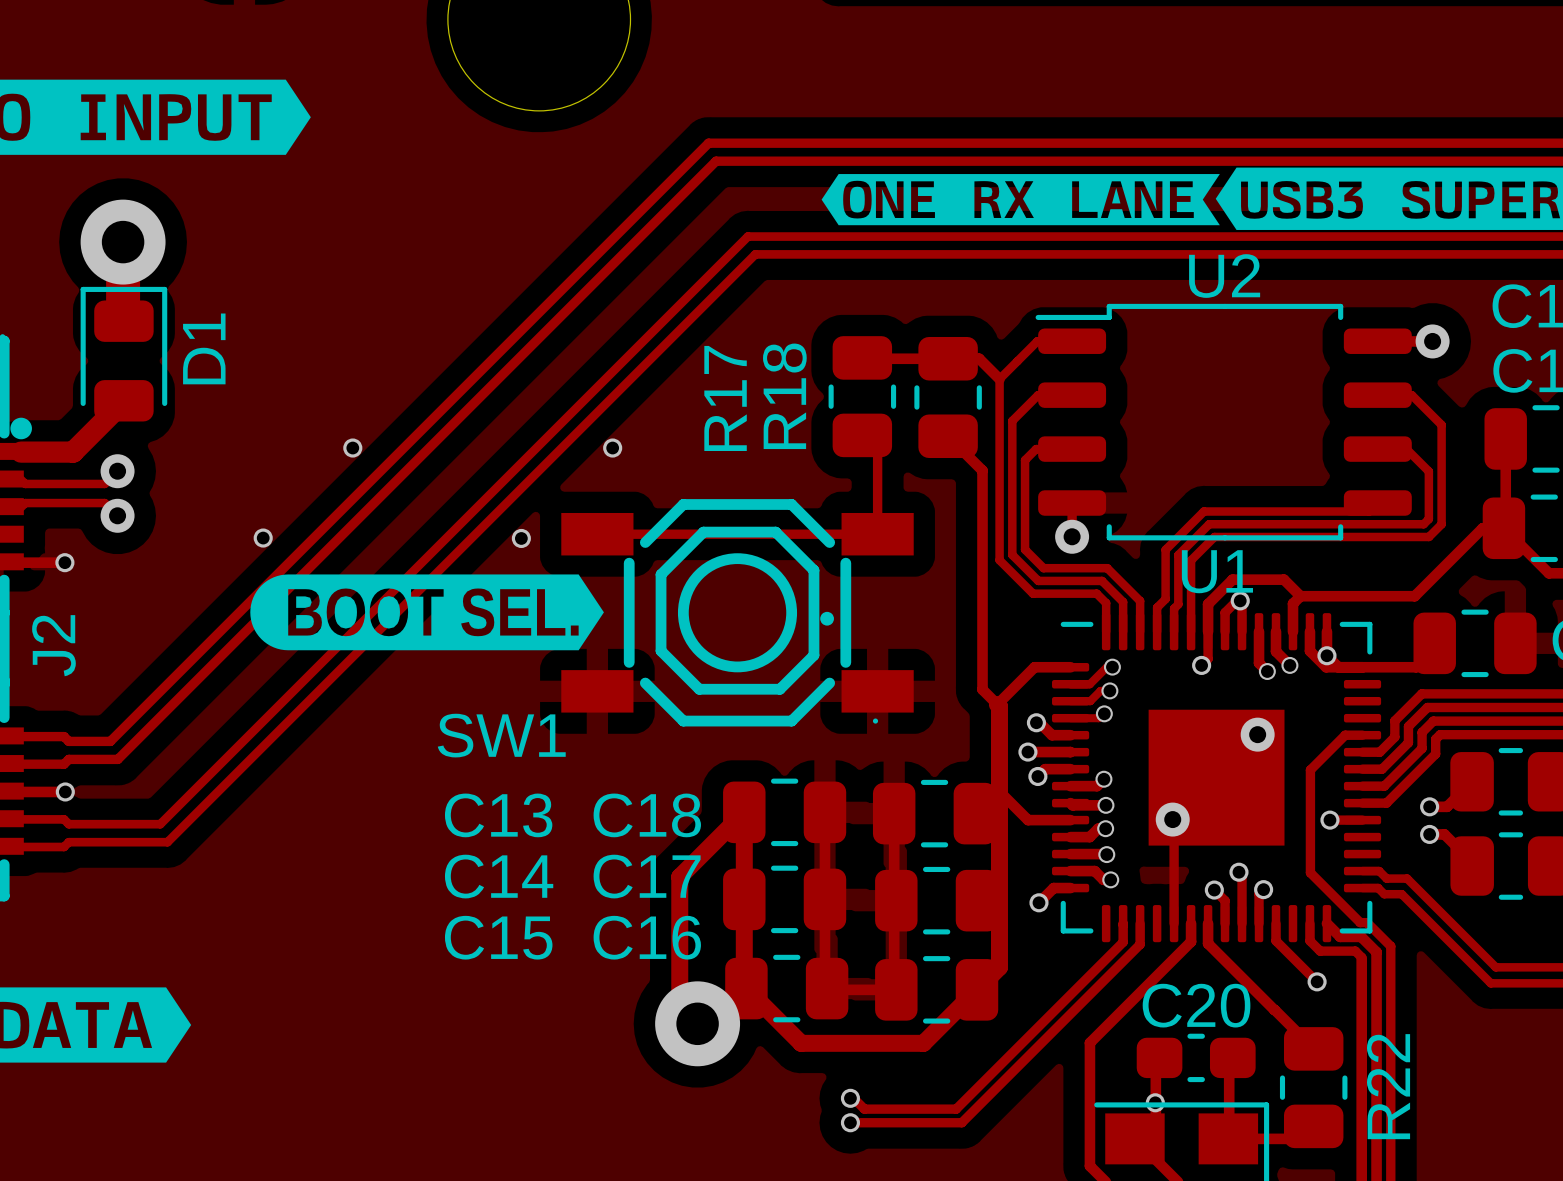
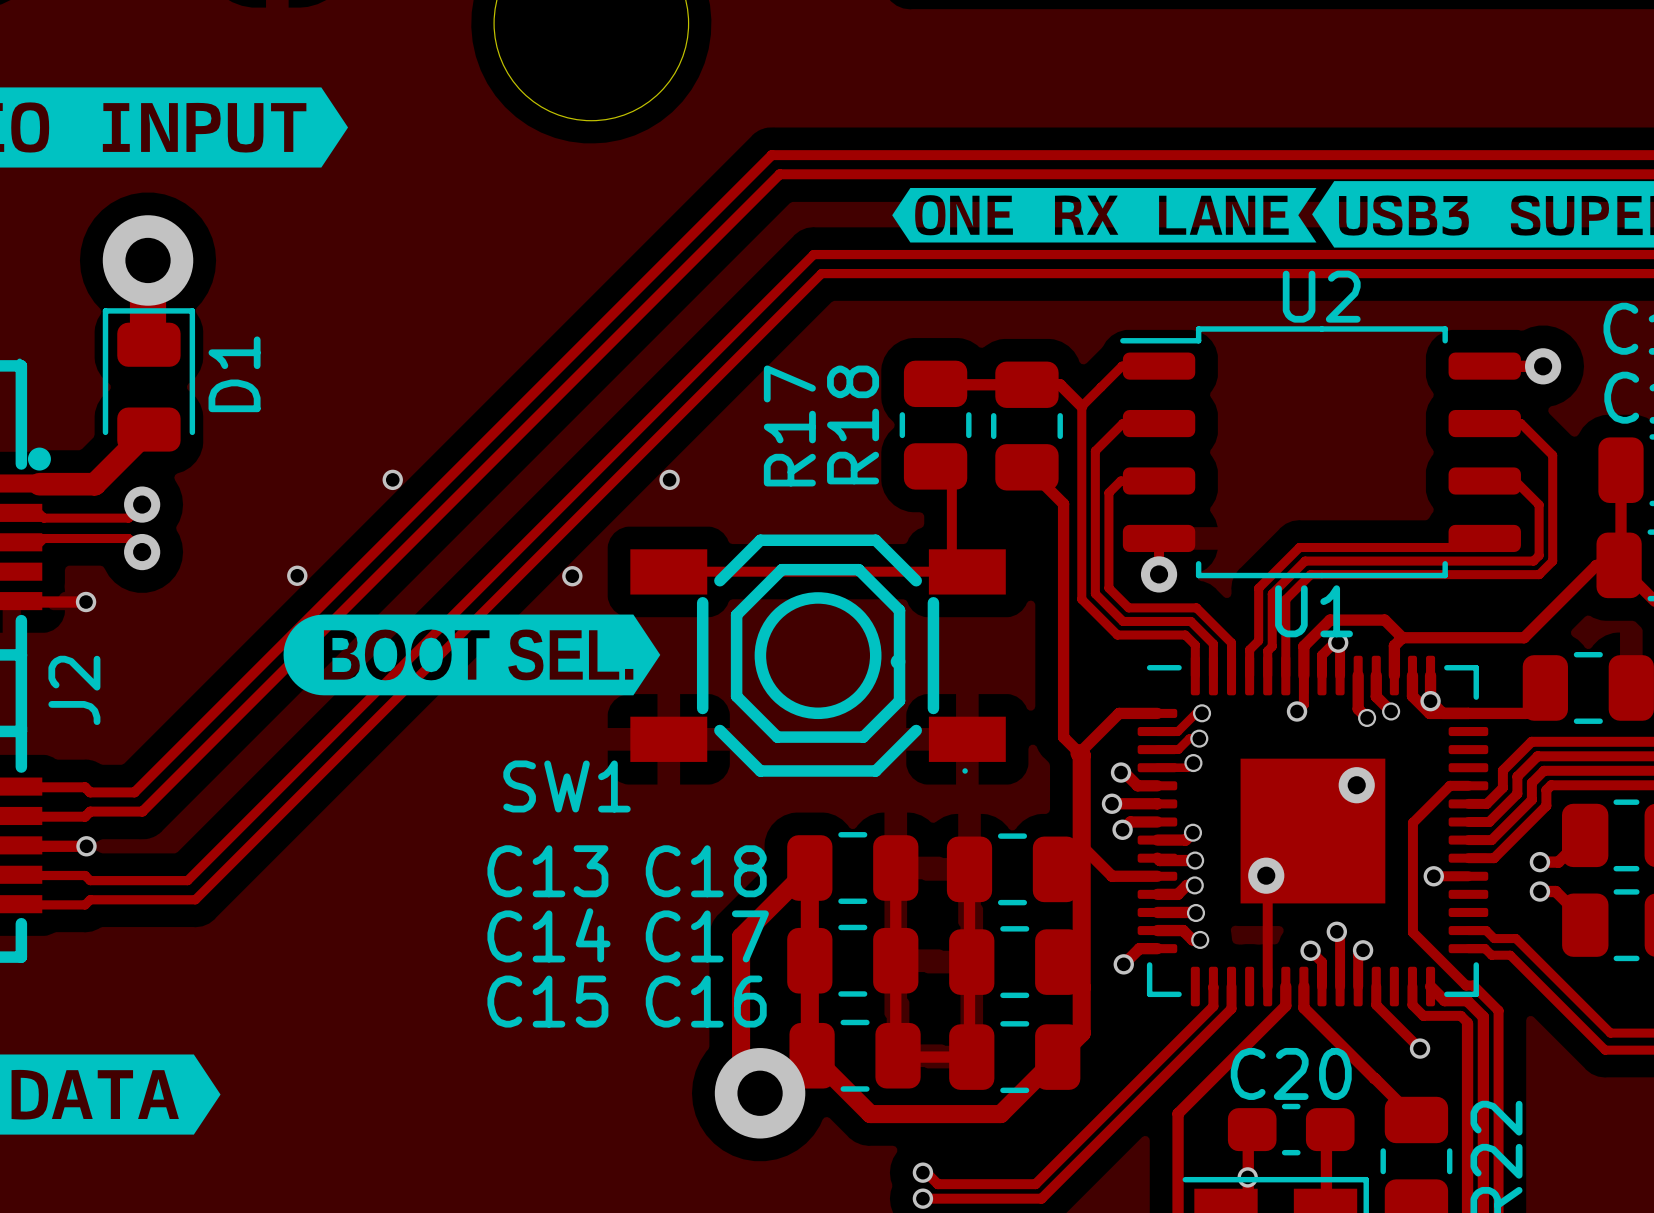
SW1 position: (737, 612) -> (818, 655)

